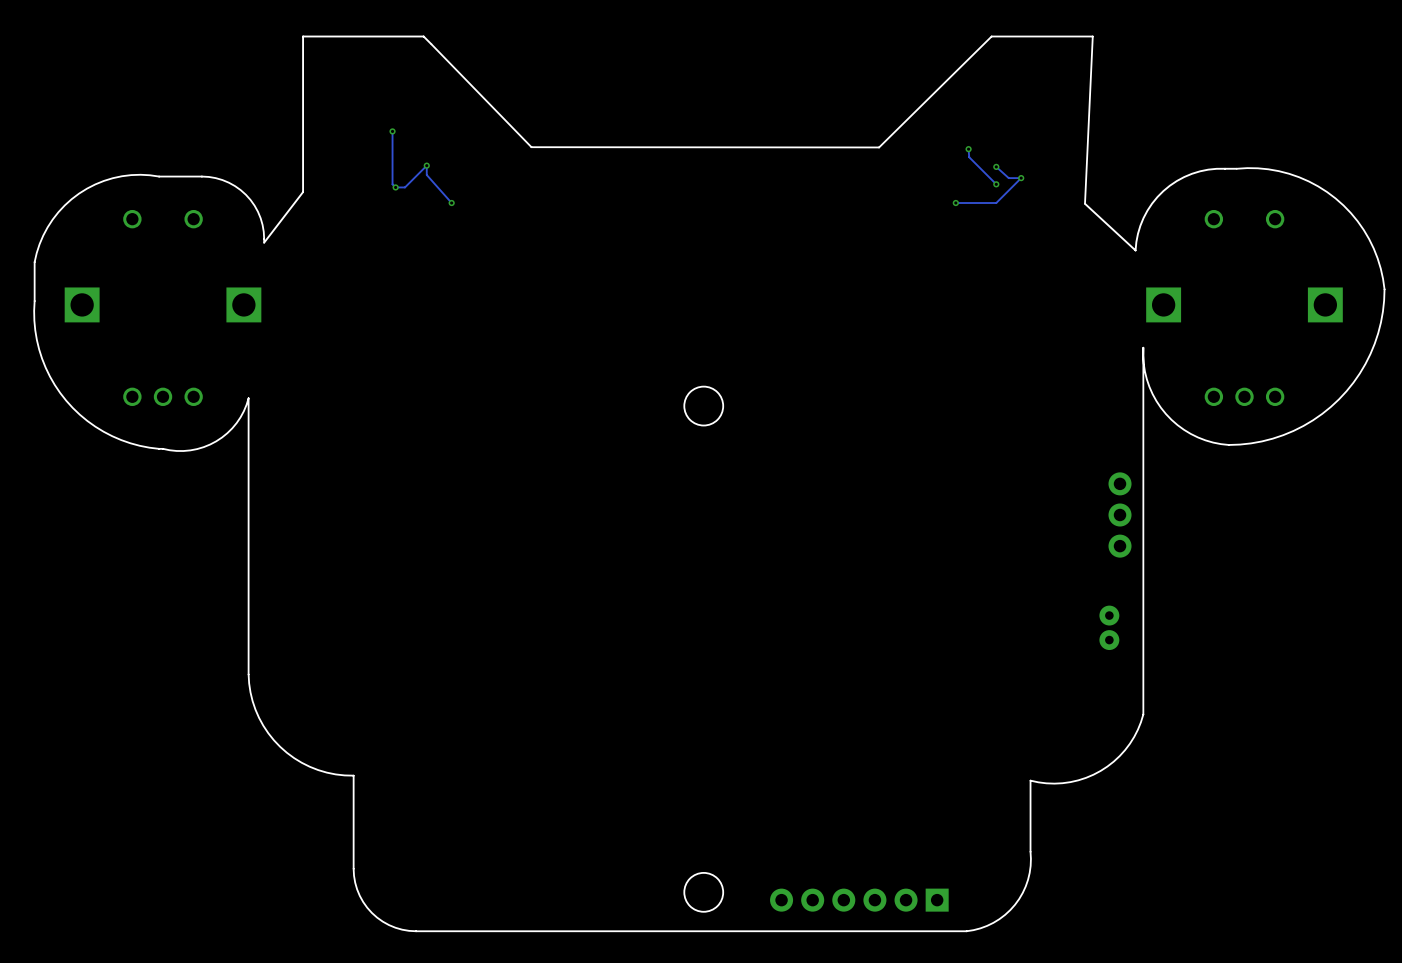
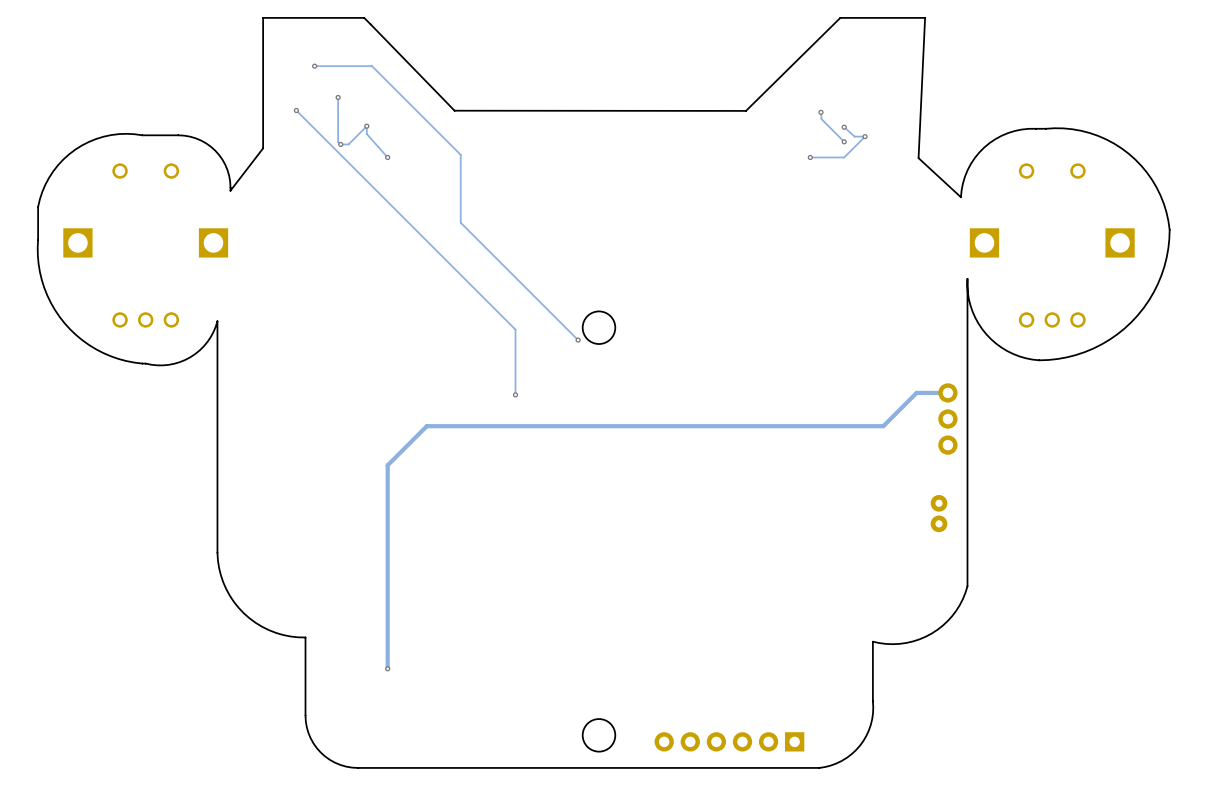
track: none -> (314, 66) (372, 66) (460, 154) (460, 222) (578, 340)
via: none -> (314, 66)
track: none -> (296, 110) (515, 329) (515, 394)
via: none -> (296, 110)
via: none -> (578, 340)
track: none -> (947, 392) (916, 392) (883, 426) (426, 426) (387, 465) (387, 668)
via: none -> (515, 394)
via: none -> (387, 668)

